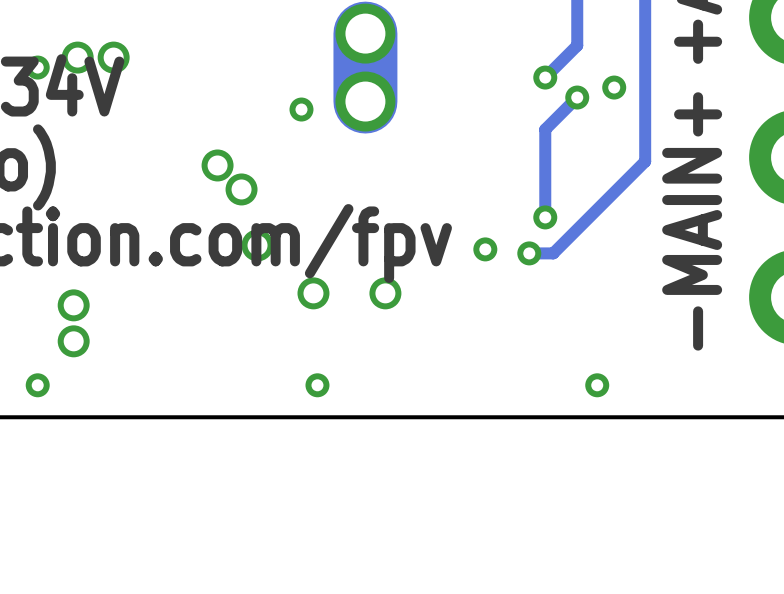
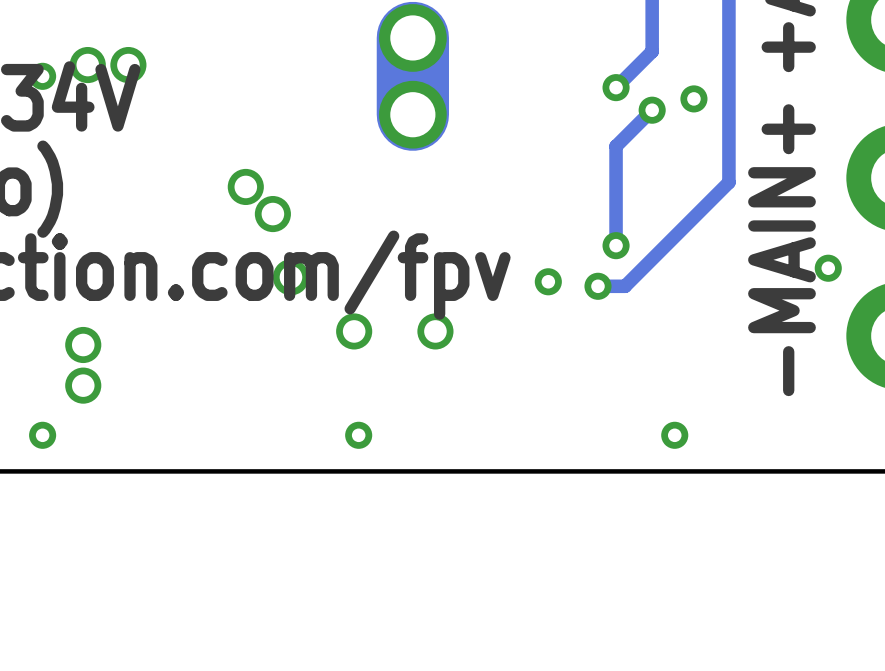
via: (301, 109) -> none
via: none -> (828, 268)

